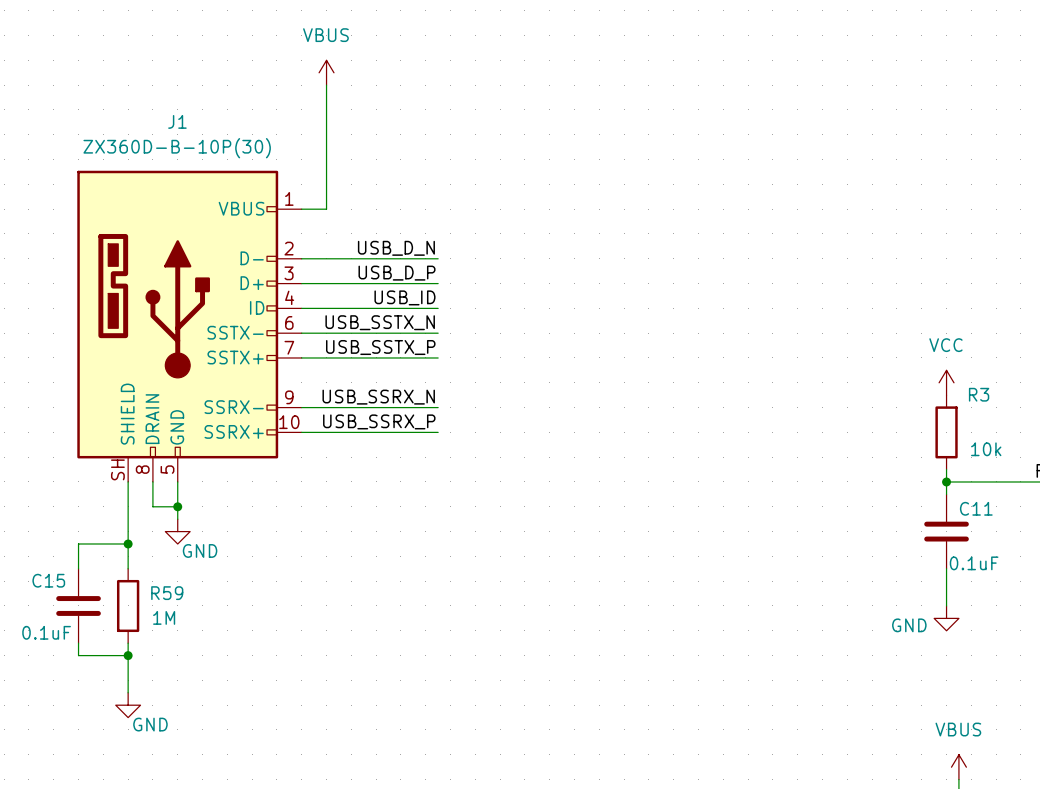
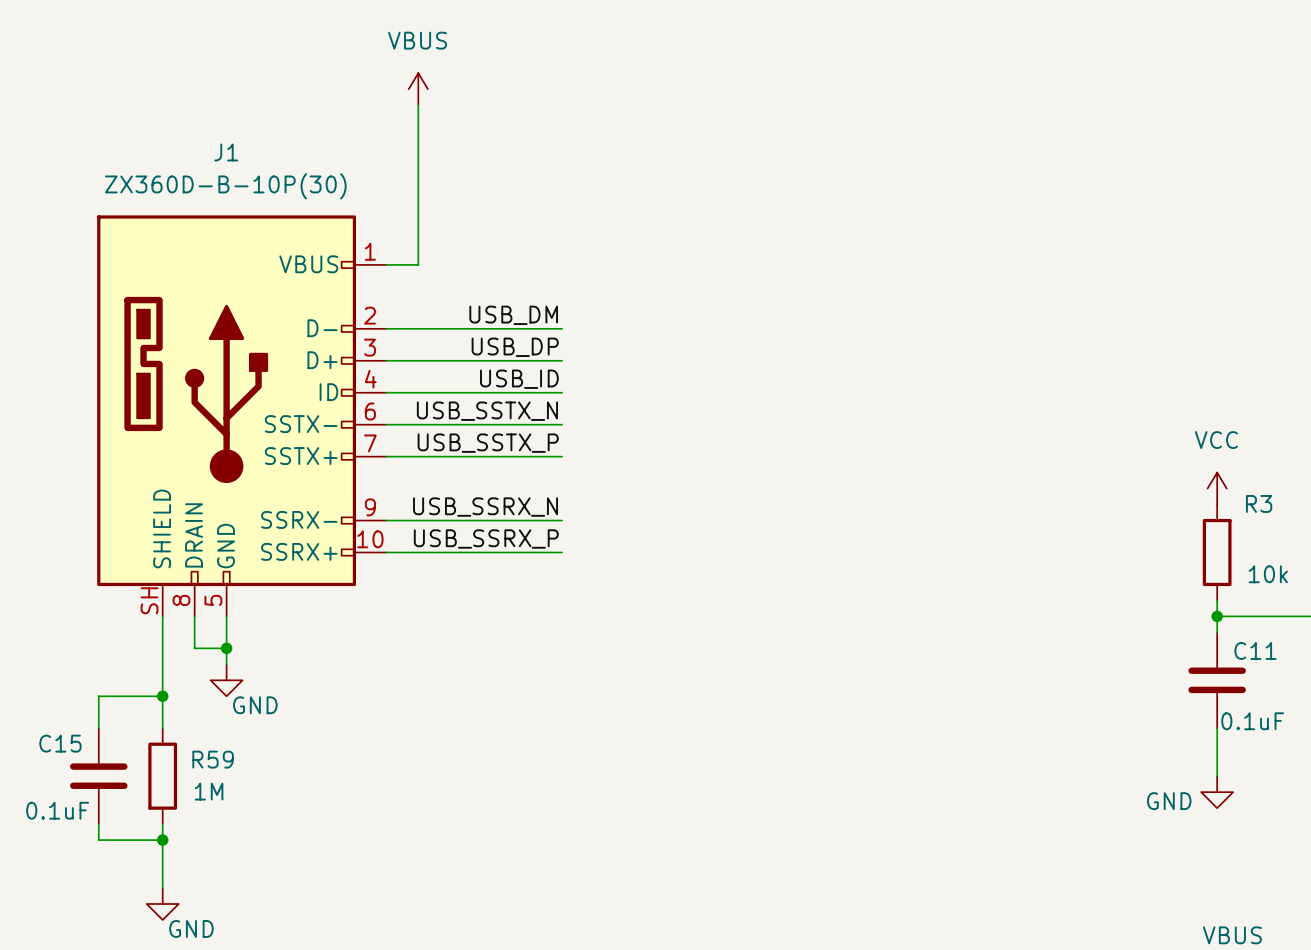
label: USB_D_N (396, 248) -> USB_DM (513, 315)
label: USB_D_P (397, 273) -> USB_DP (515, 347)

